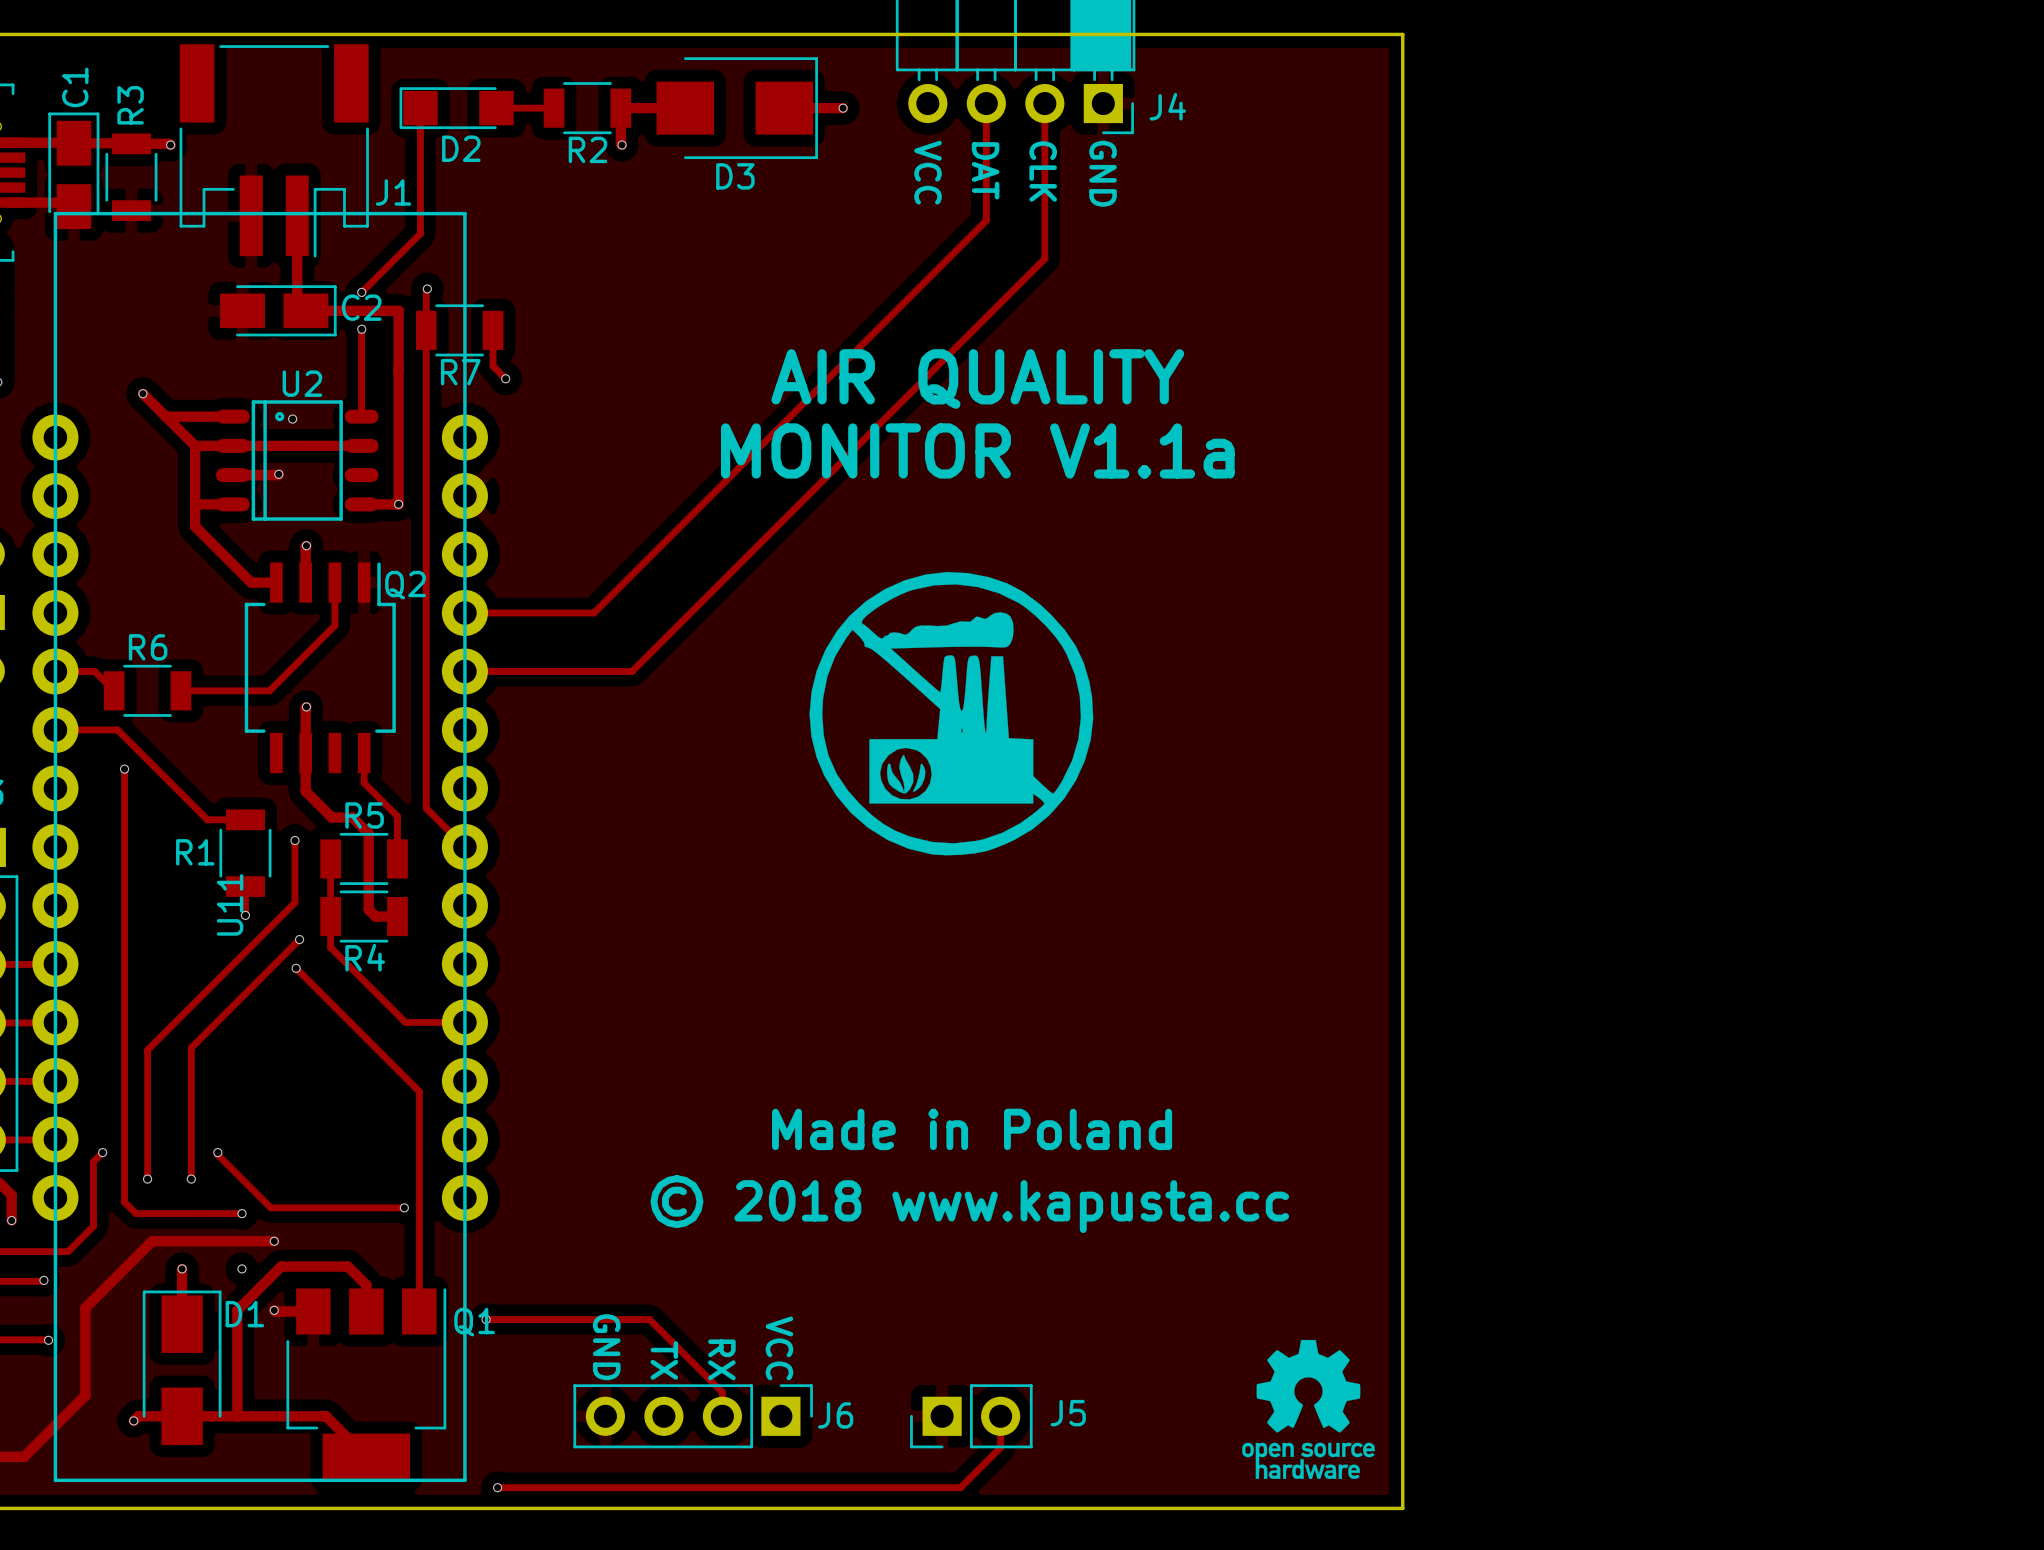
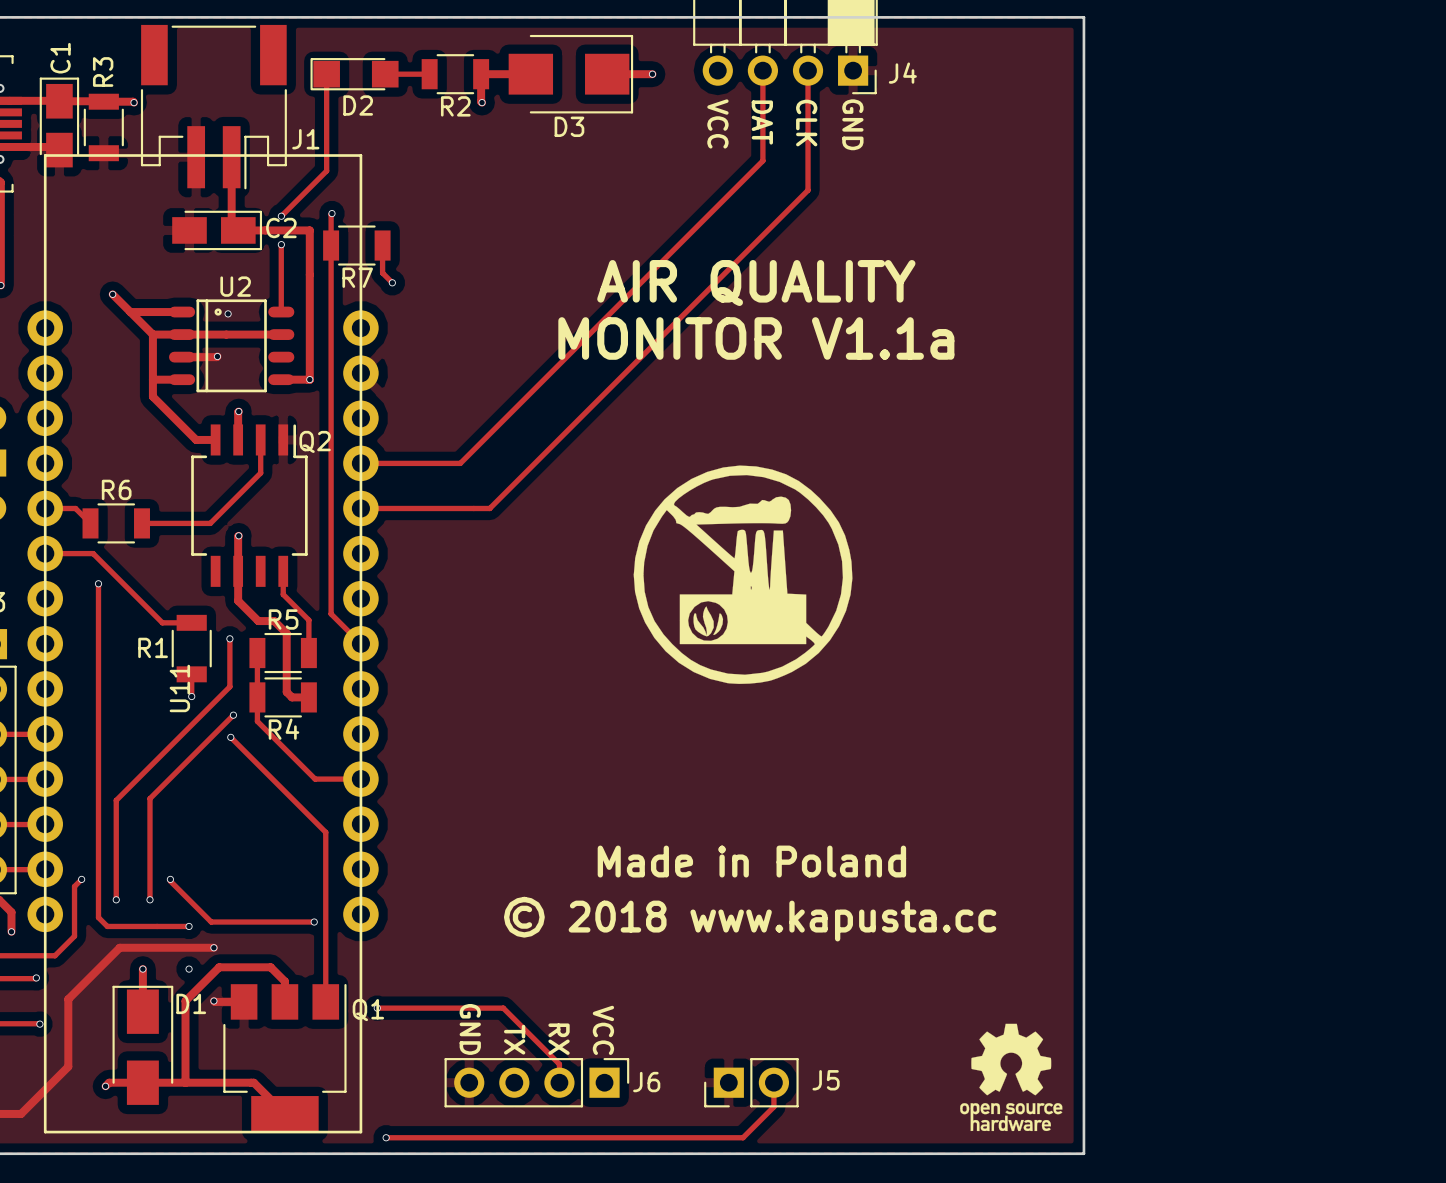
drawing position: (951, 713) -> (743, 574)

